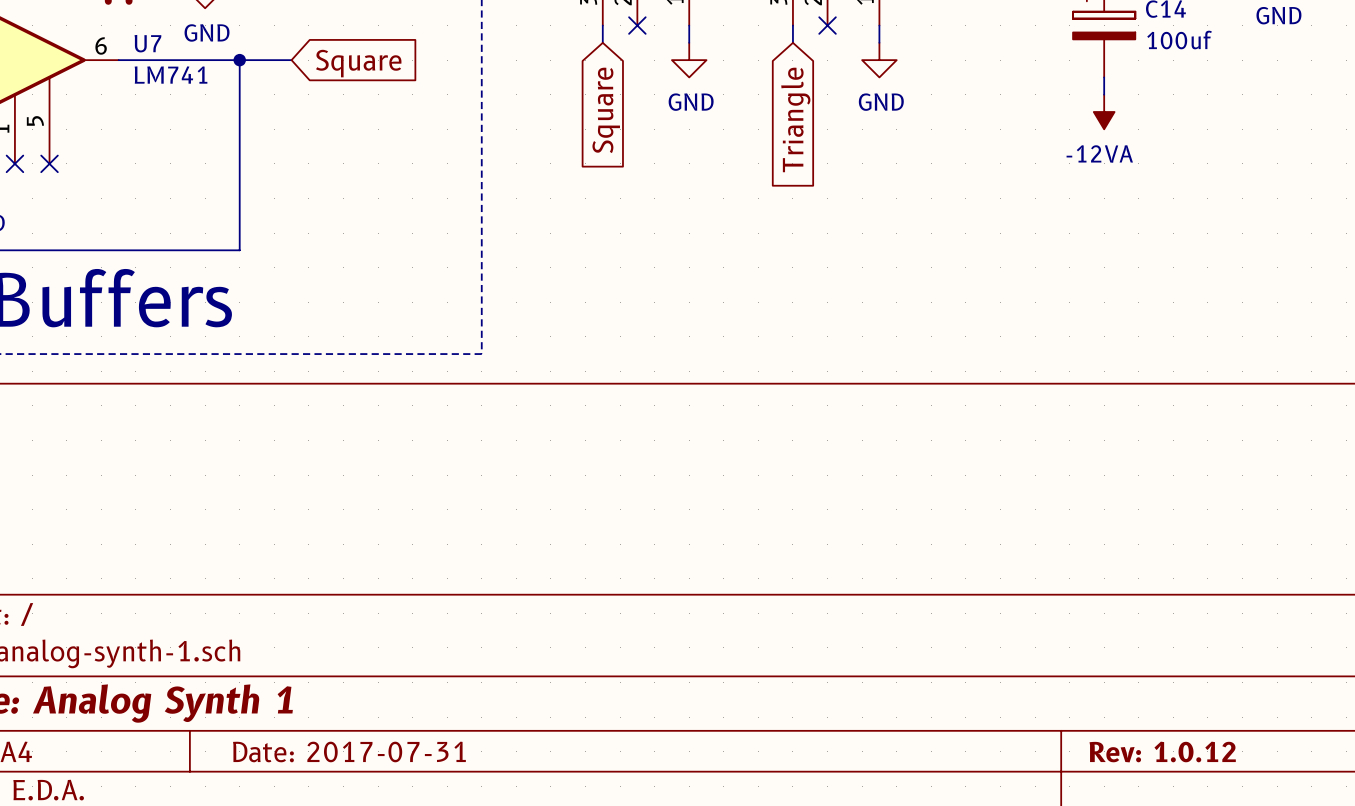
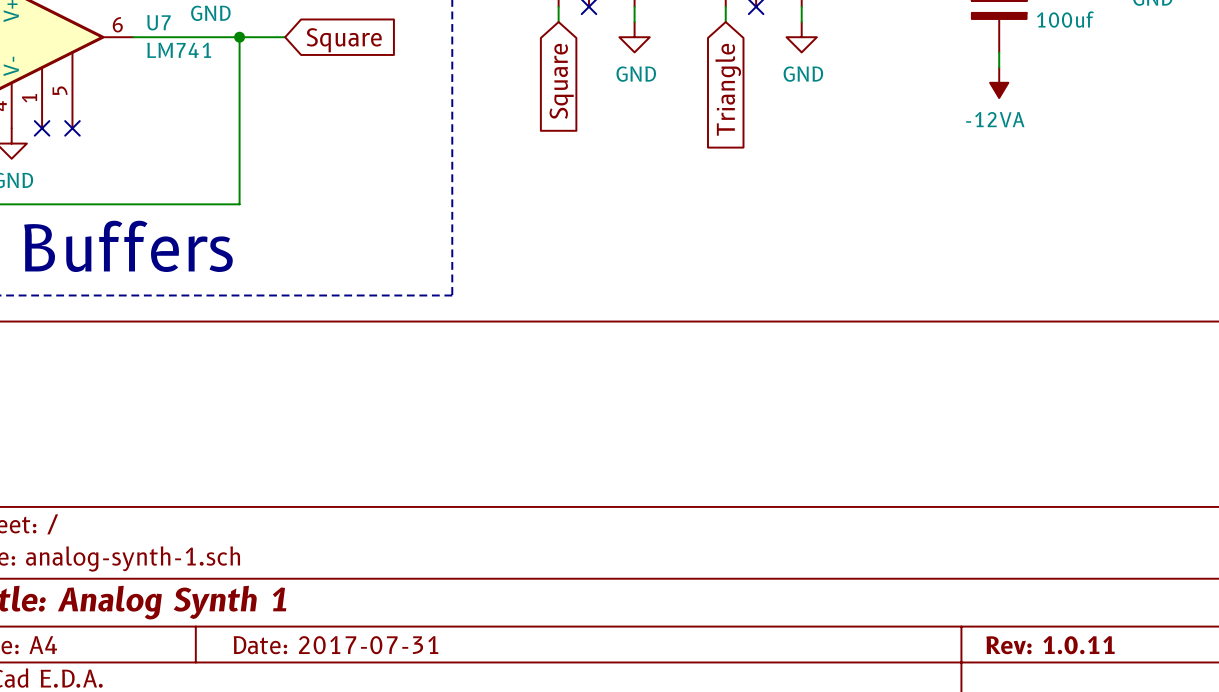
title block: Rev: 1.0.12 (1162, 752) -> Rev: 1.0.11 (1050, 645)

